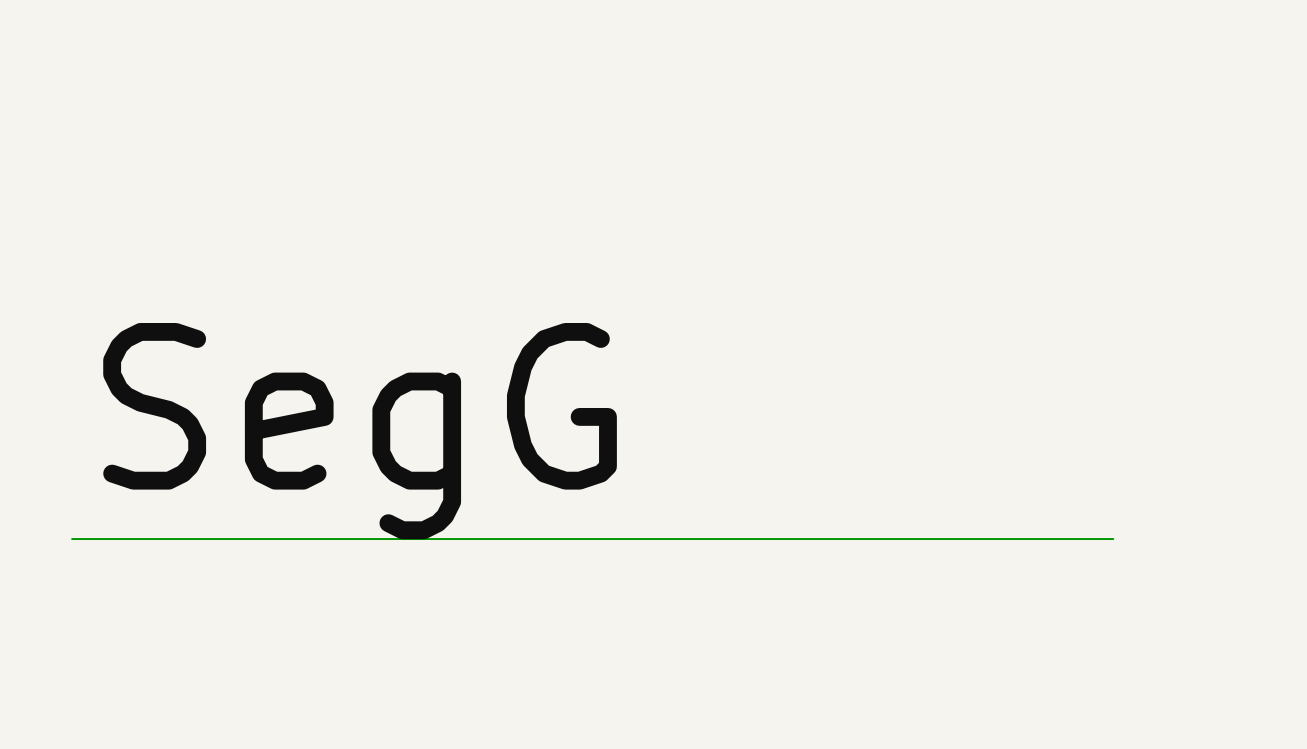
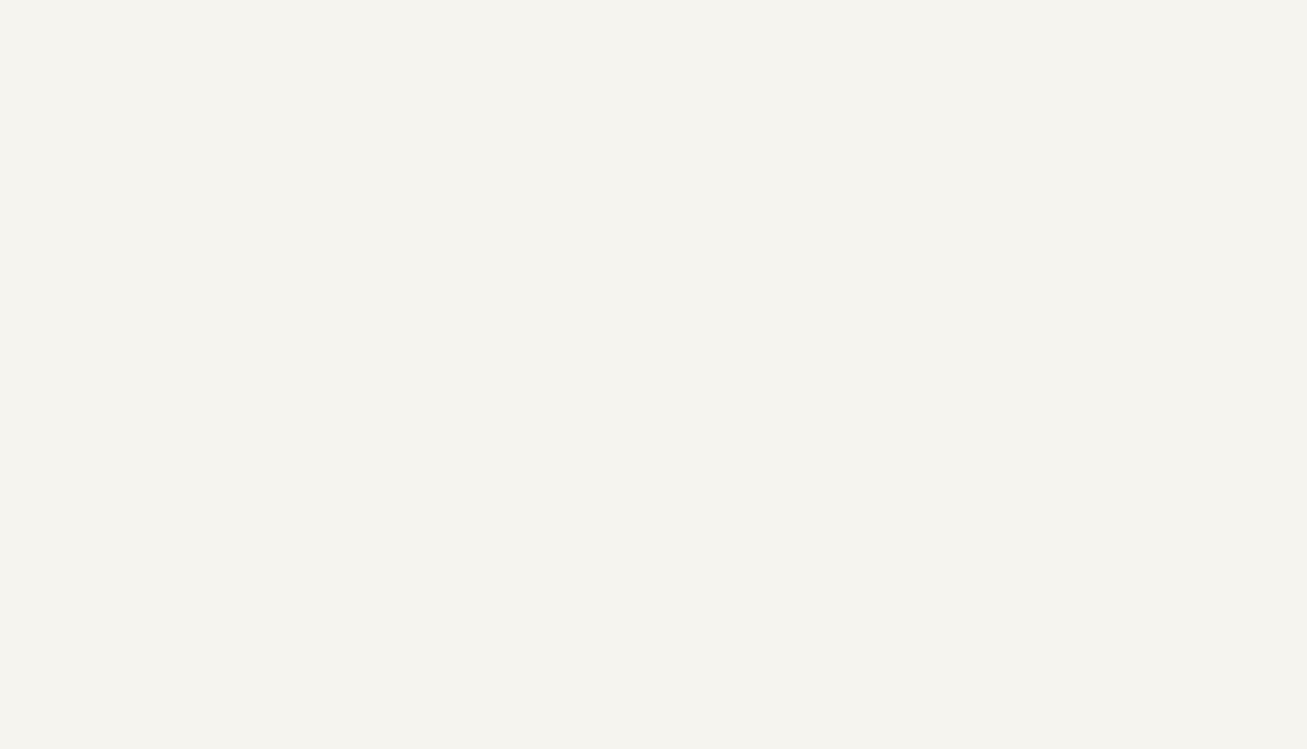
label: SegG (360, 431) -> none
wire: (72, 539) (1113, 539) -> none

